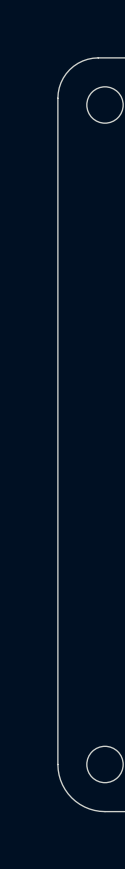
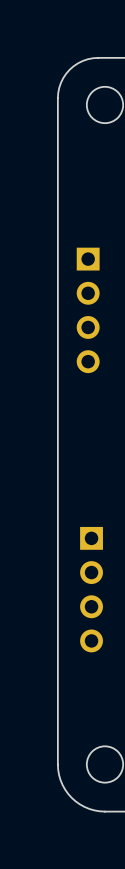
part: none -> (88, 310)
part: none -> (91, 589)

